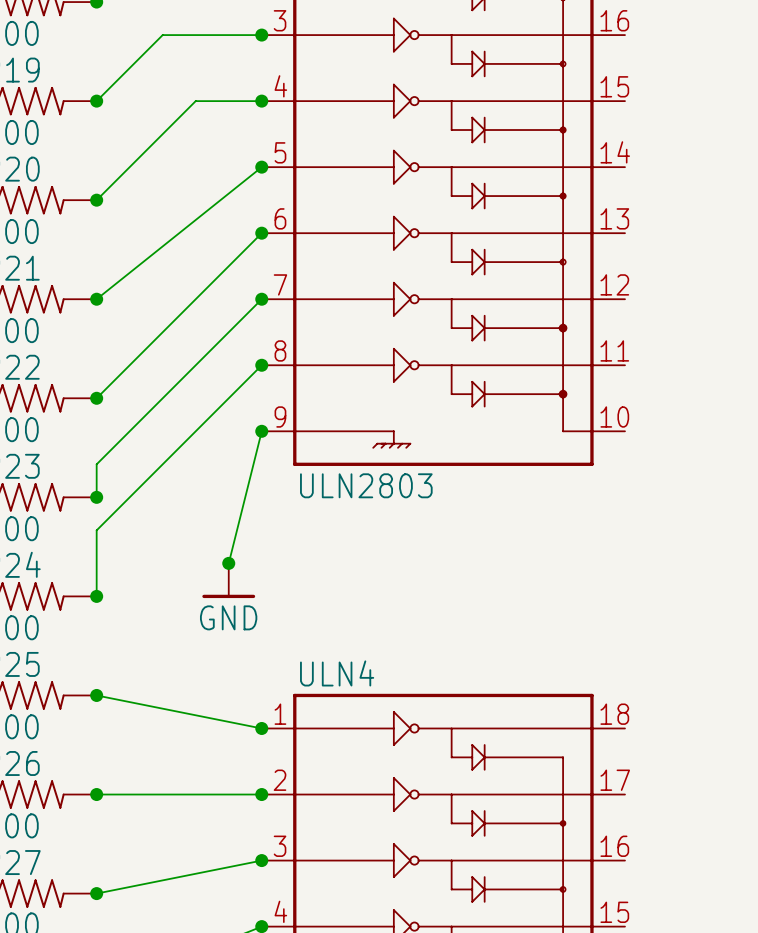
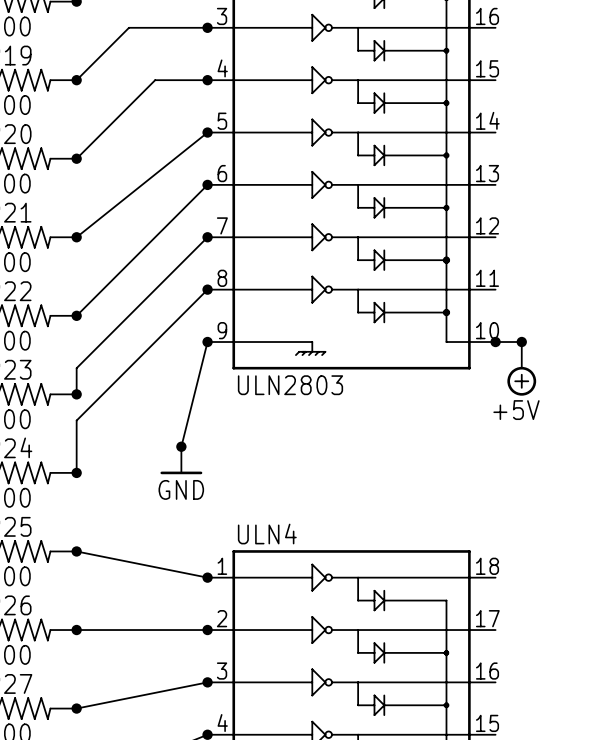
wire: none -> (495, 342) (521, 342)
junction: none -> (495, 342)
junction: none -> (521, 342)
power symbol: none -> +5V (521, 368)

